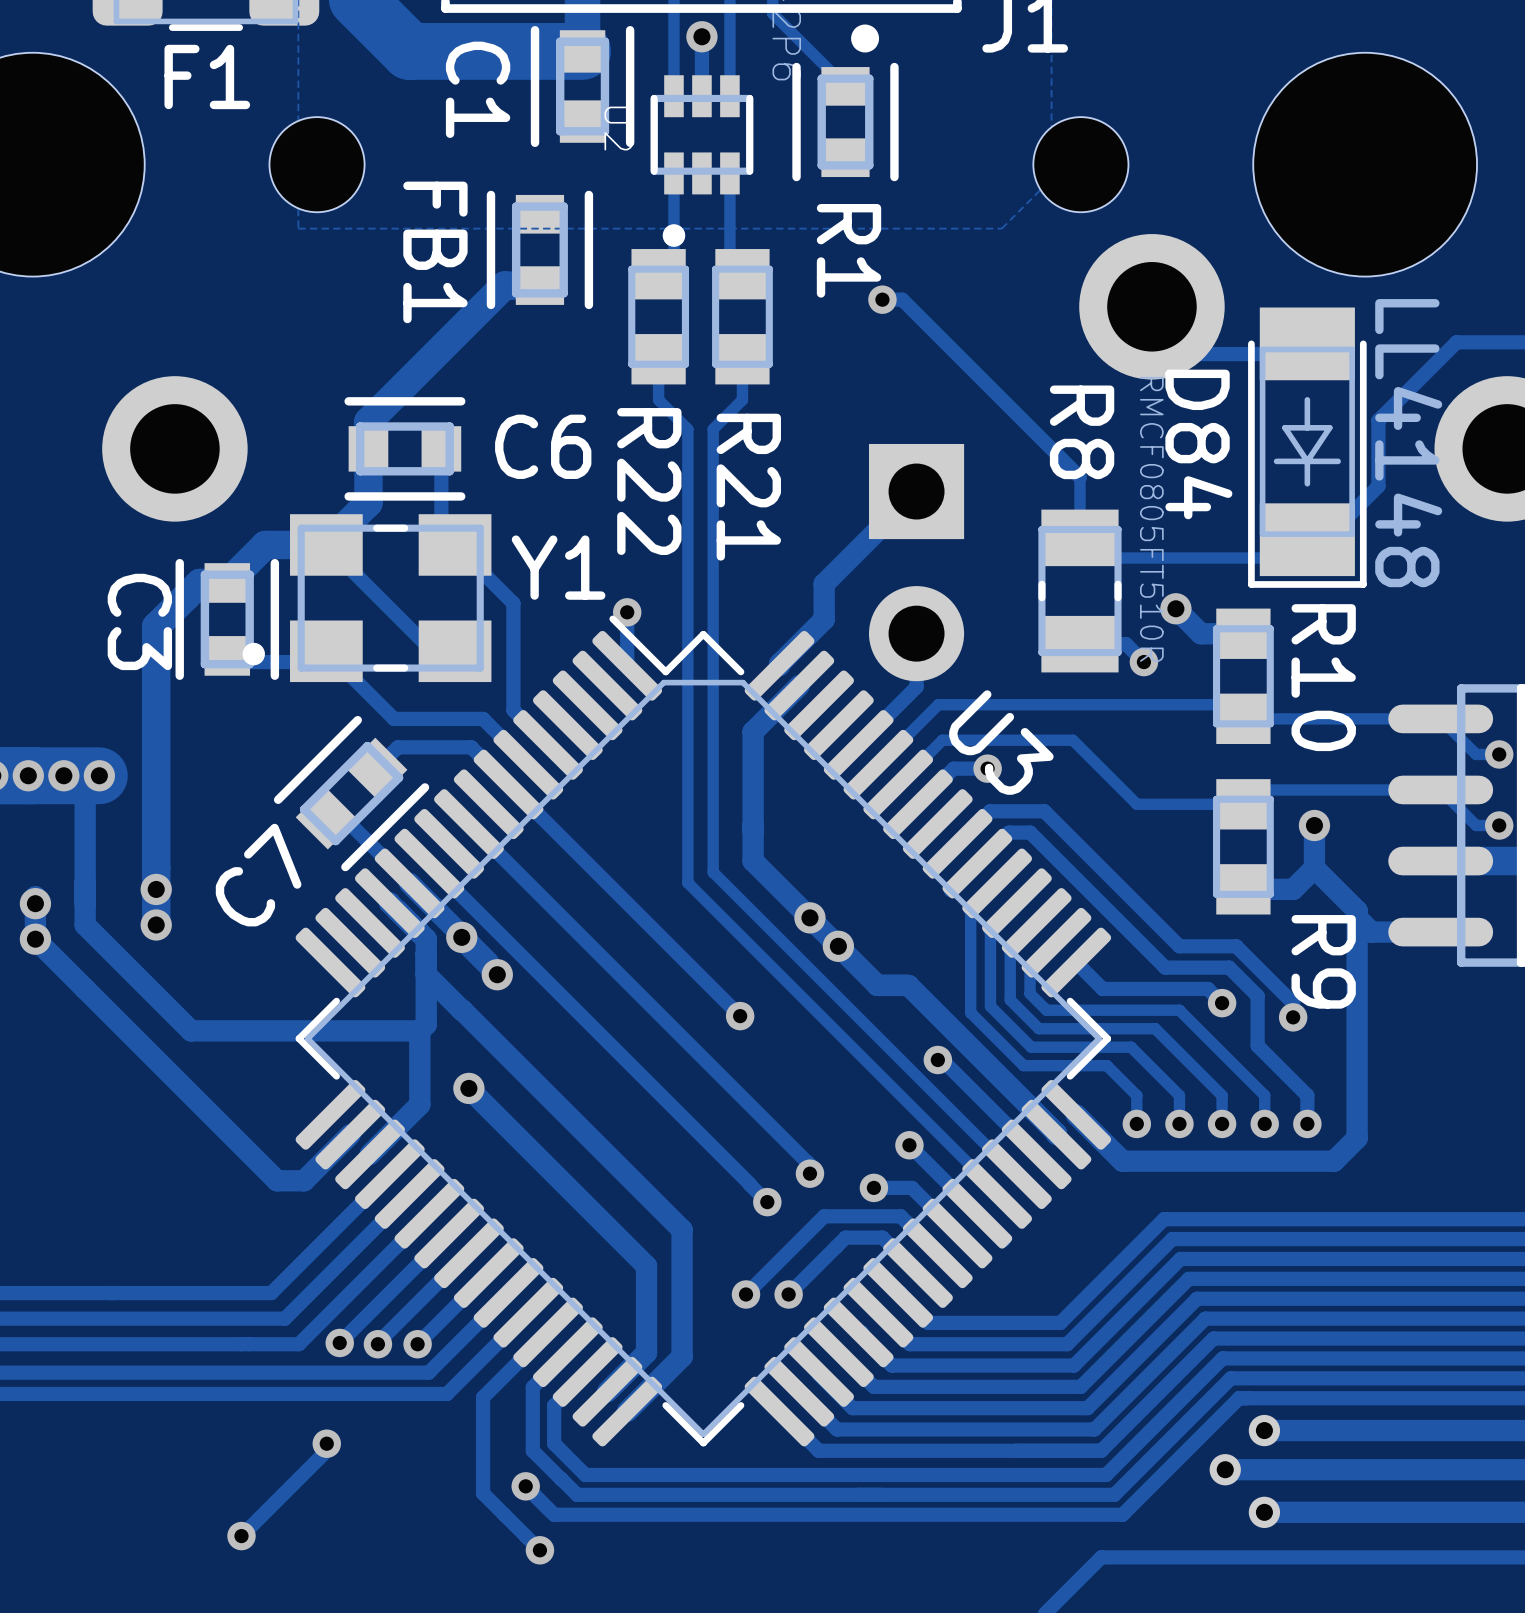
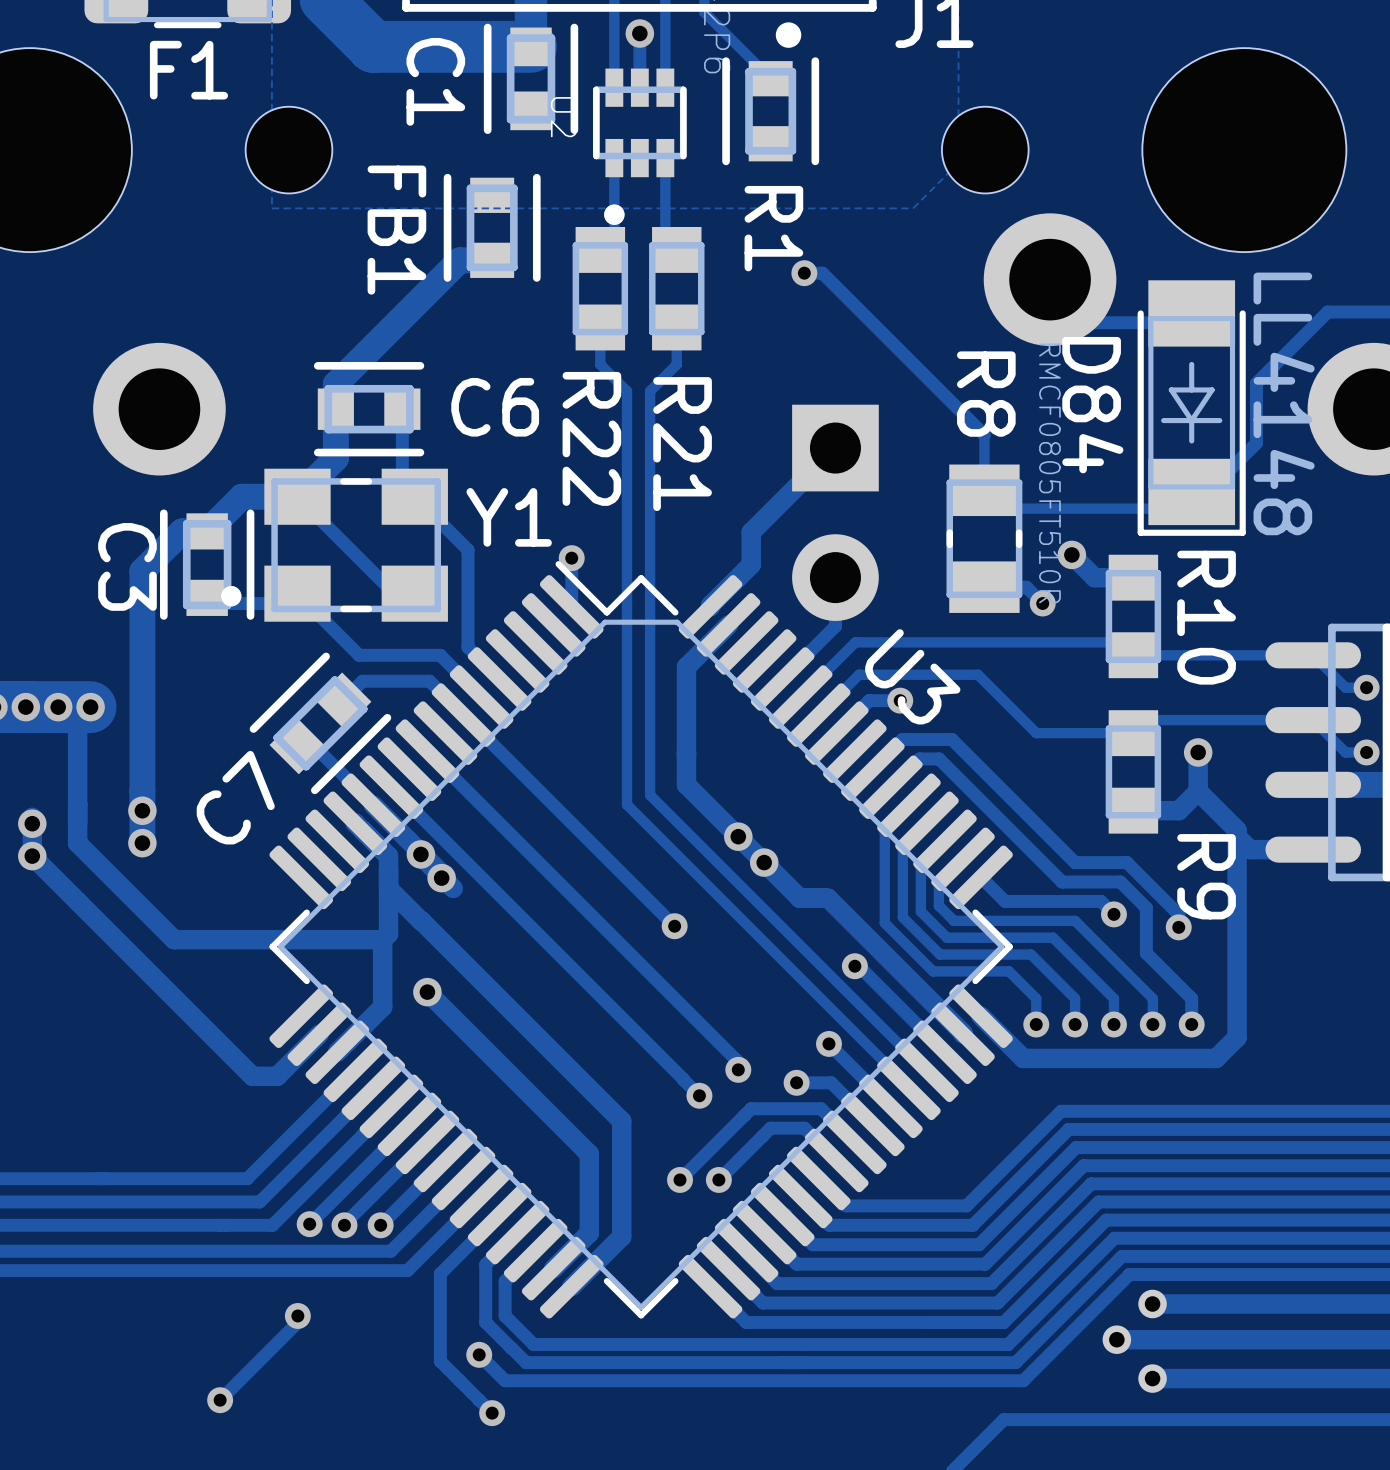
via position: (497, 974) -> (441, 878)

